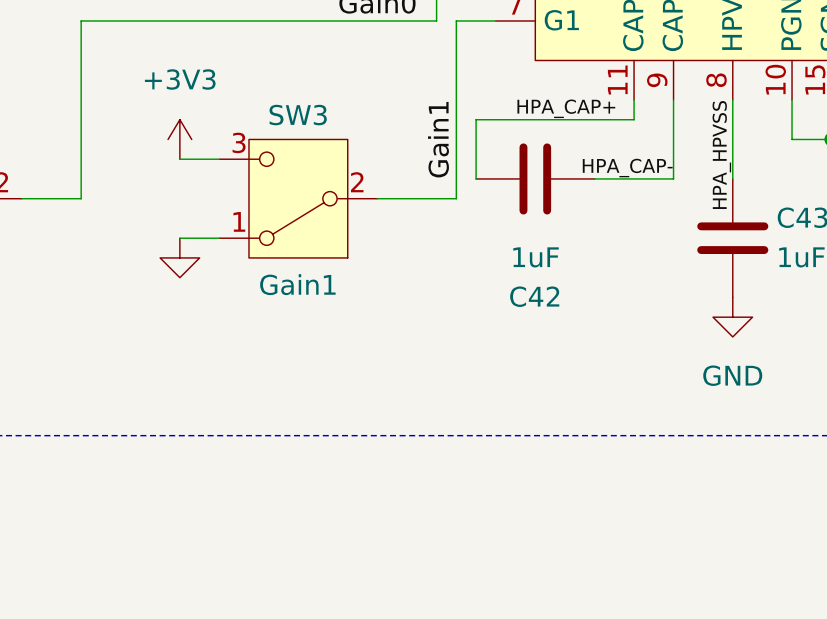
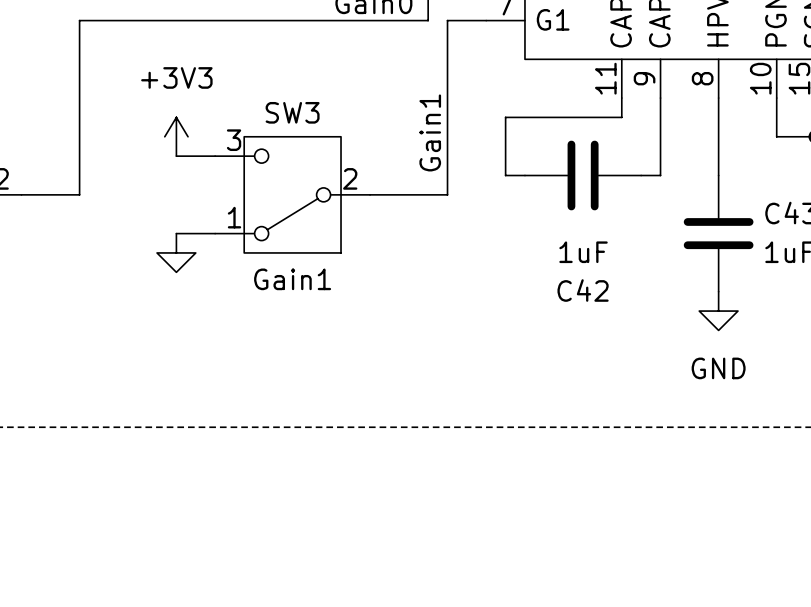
label: HPA_CAP+ (566, 108) -> none
wire: (515, 119) (476, 119) (476, 178) -> (505, 117) (505, 175) (524, 175)
label: HPA_HPVSS (721, 155) -> none
label: HPA_CAP- (627, 168) -> none
C42 position: (535, 178) -> (583, 175)

